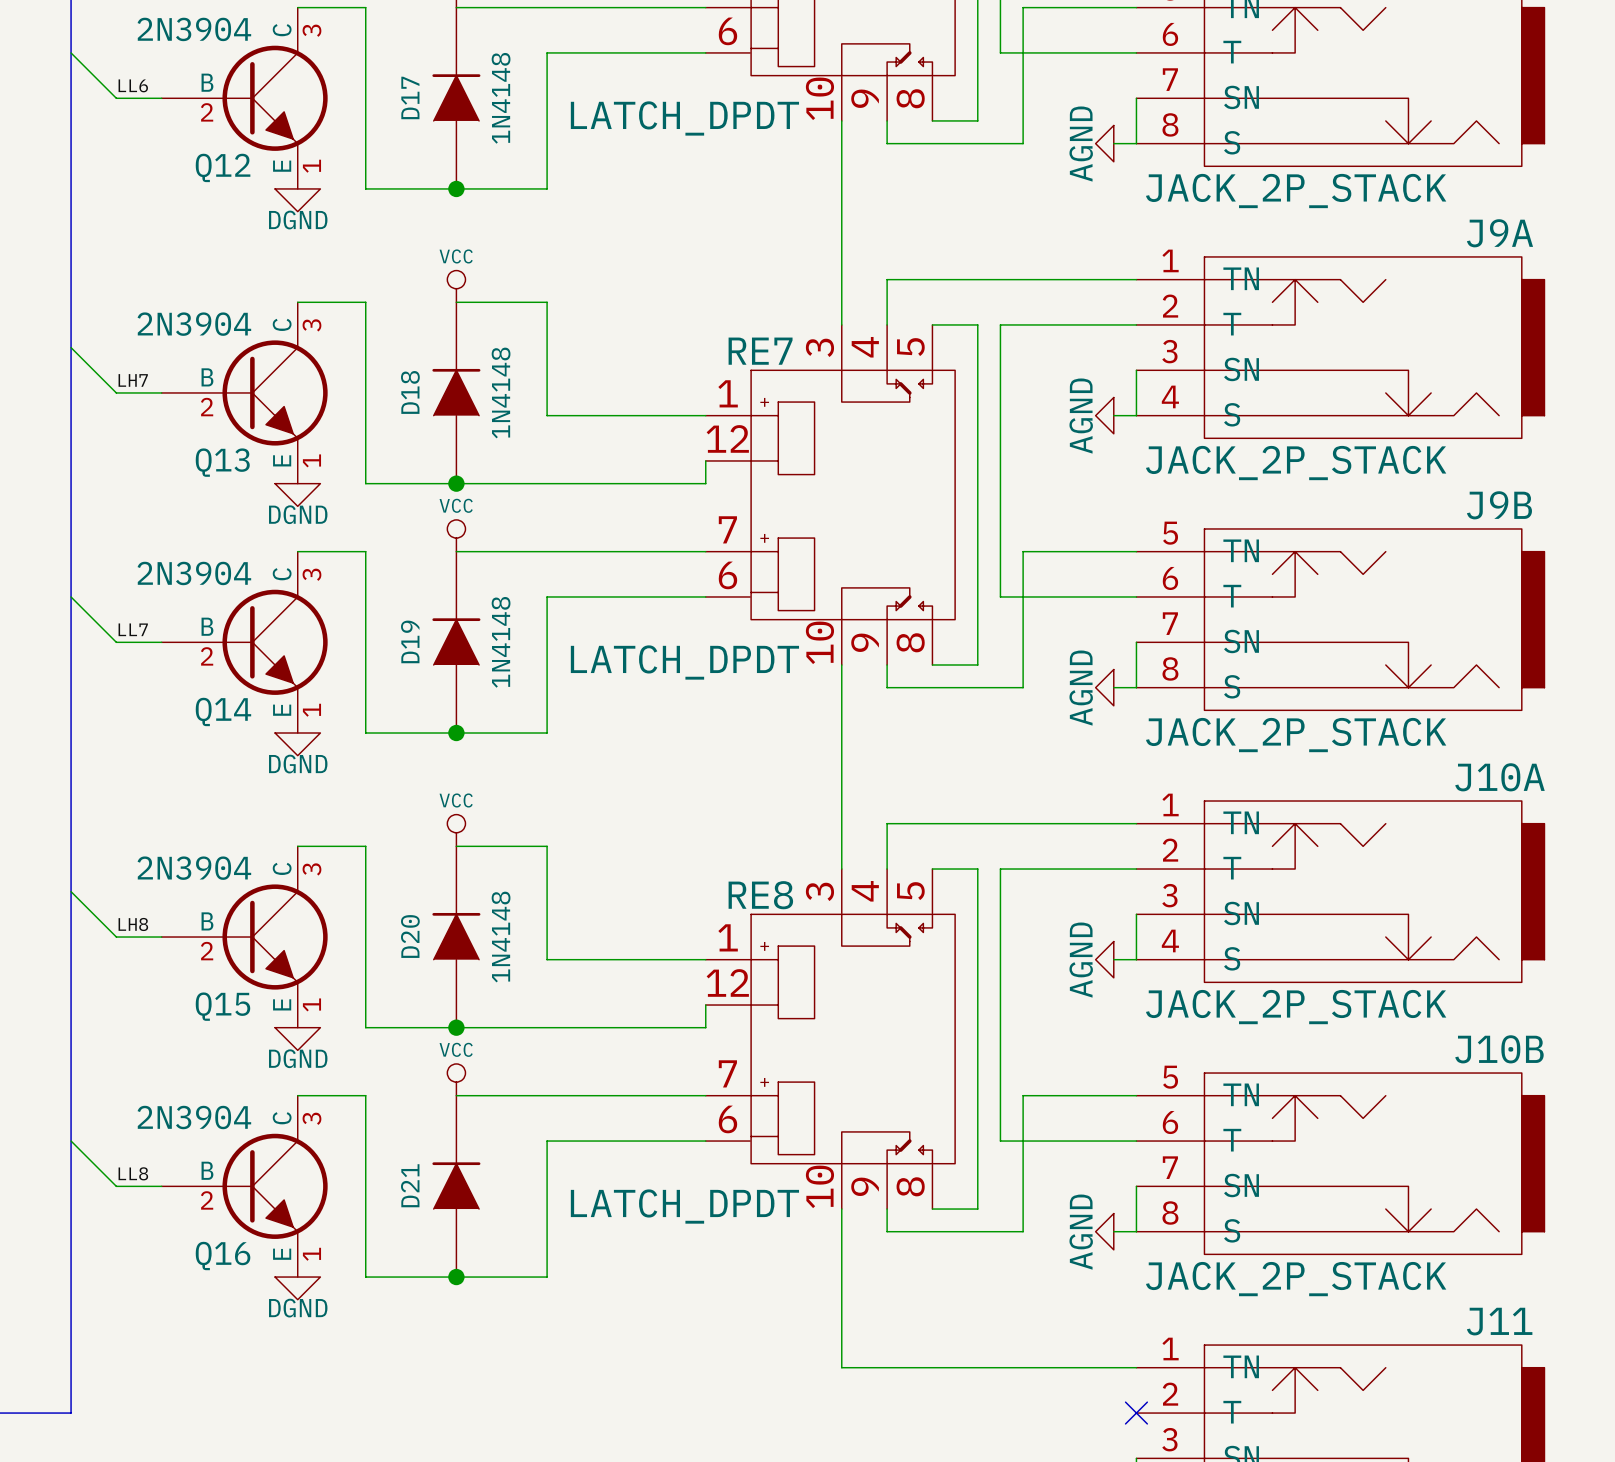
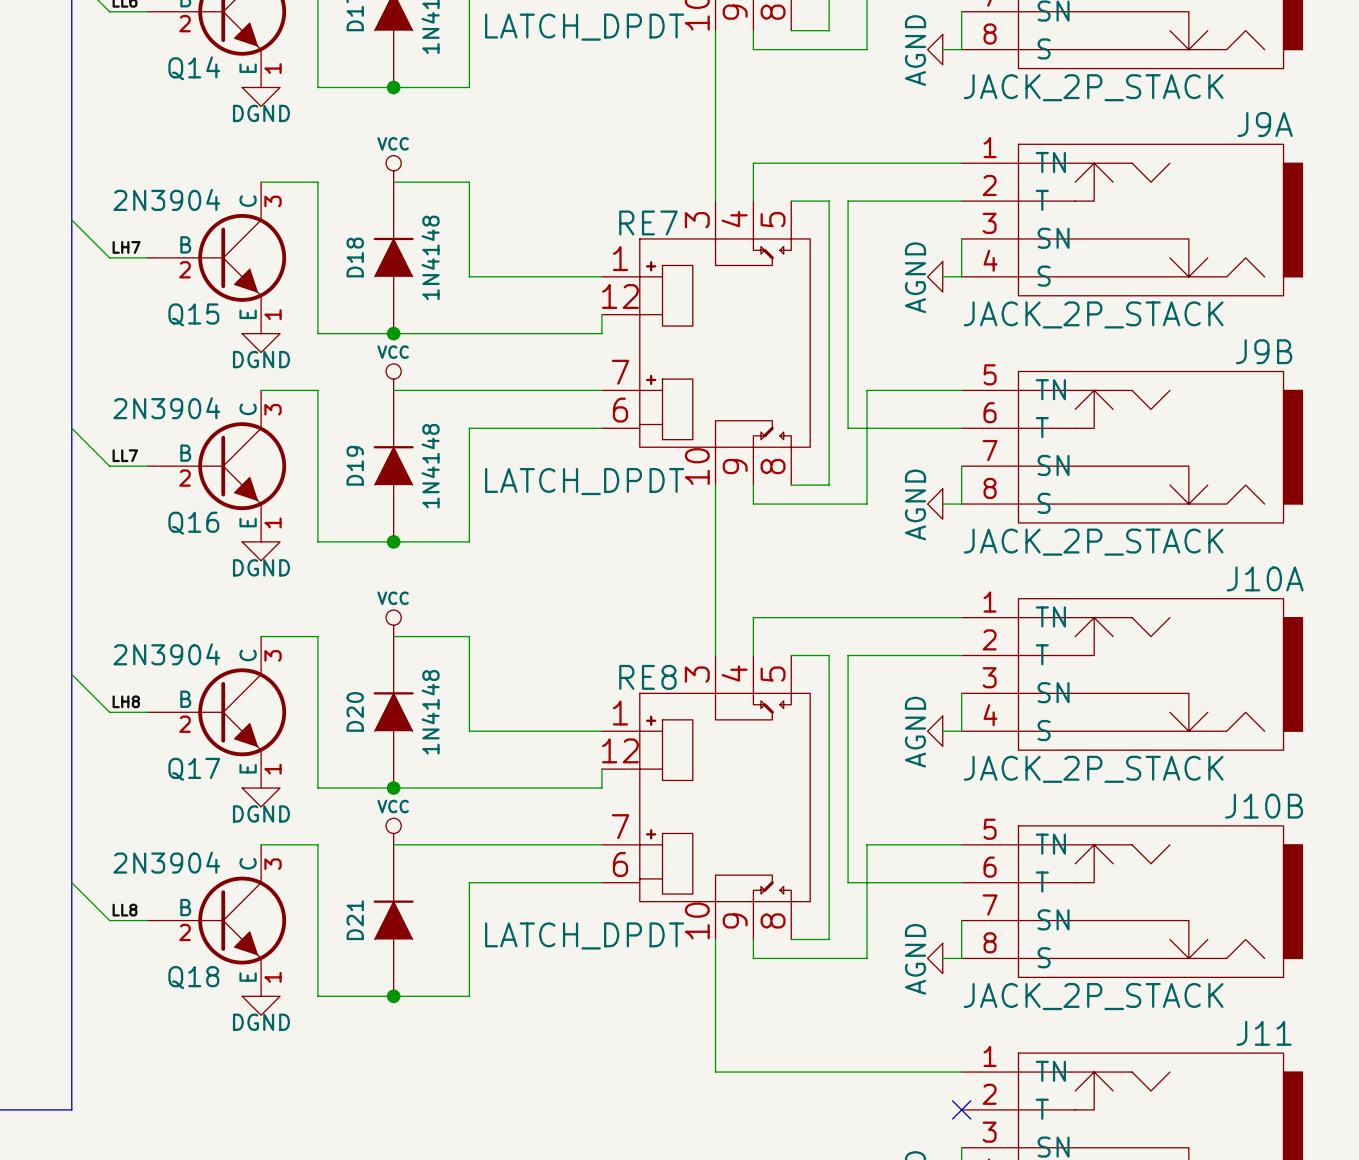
Q12 name: Q12 (223, 167) -> Q14 (194, 68)
Q13 name: Q13 (222, 462) -> Q15 (193, 314)
Q14 name: Q14 (223, 711) -> Q16 (193, 523)
Q15 name: Q15 (222, 1006) -> Q17 (194, 769)
Q16 name: Q16 (223, 1255) -> Q18 (193, 977)

